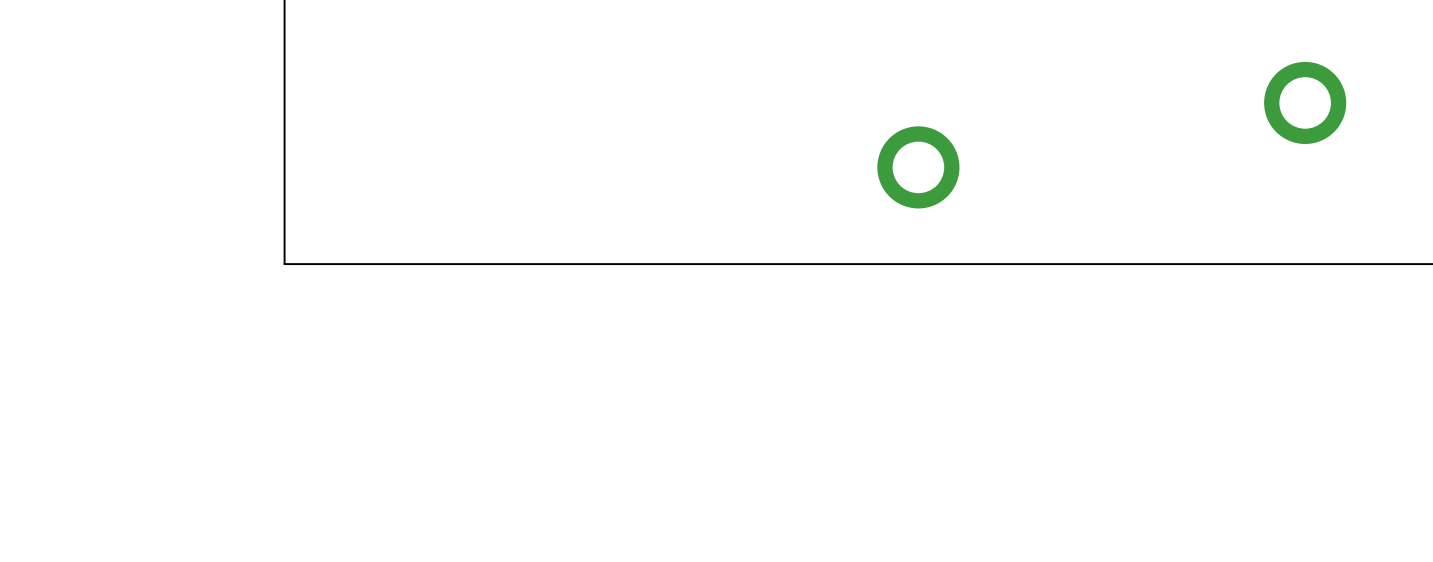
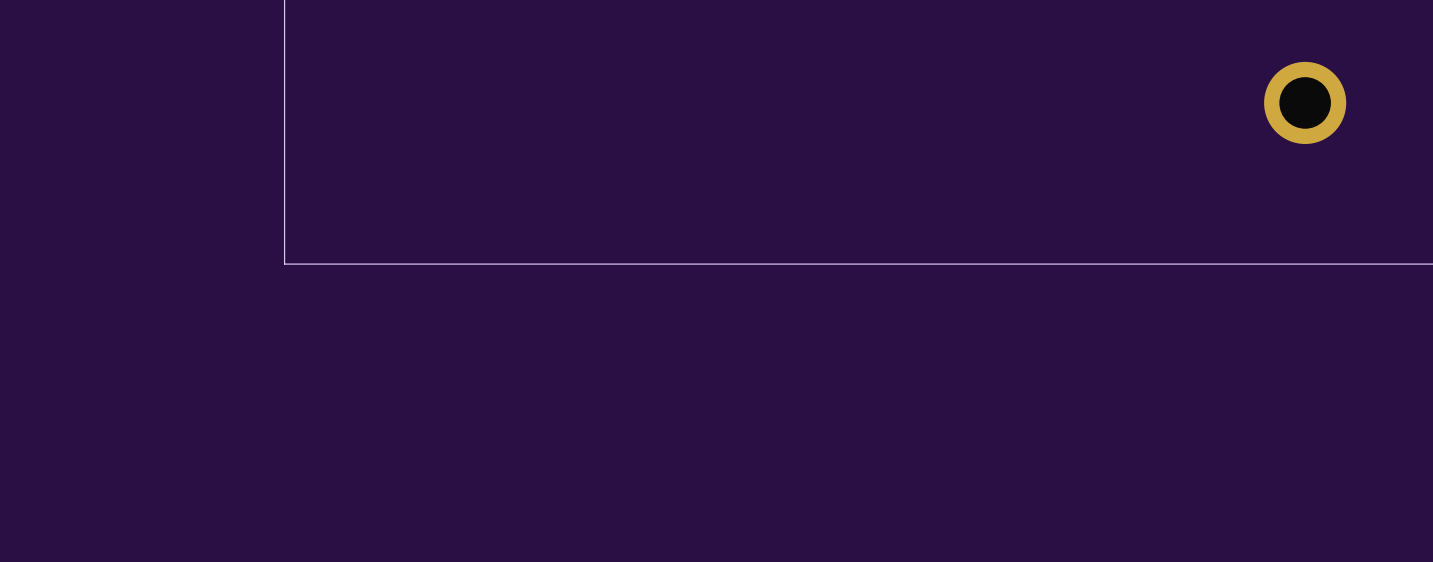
via: (918, 167) -> none

